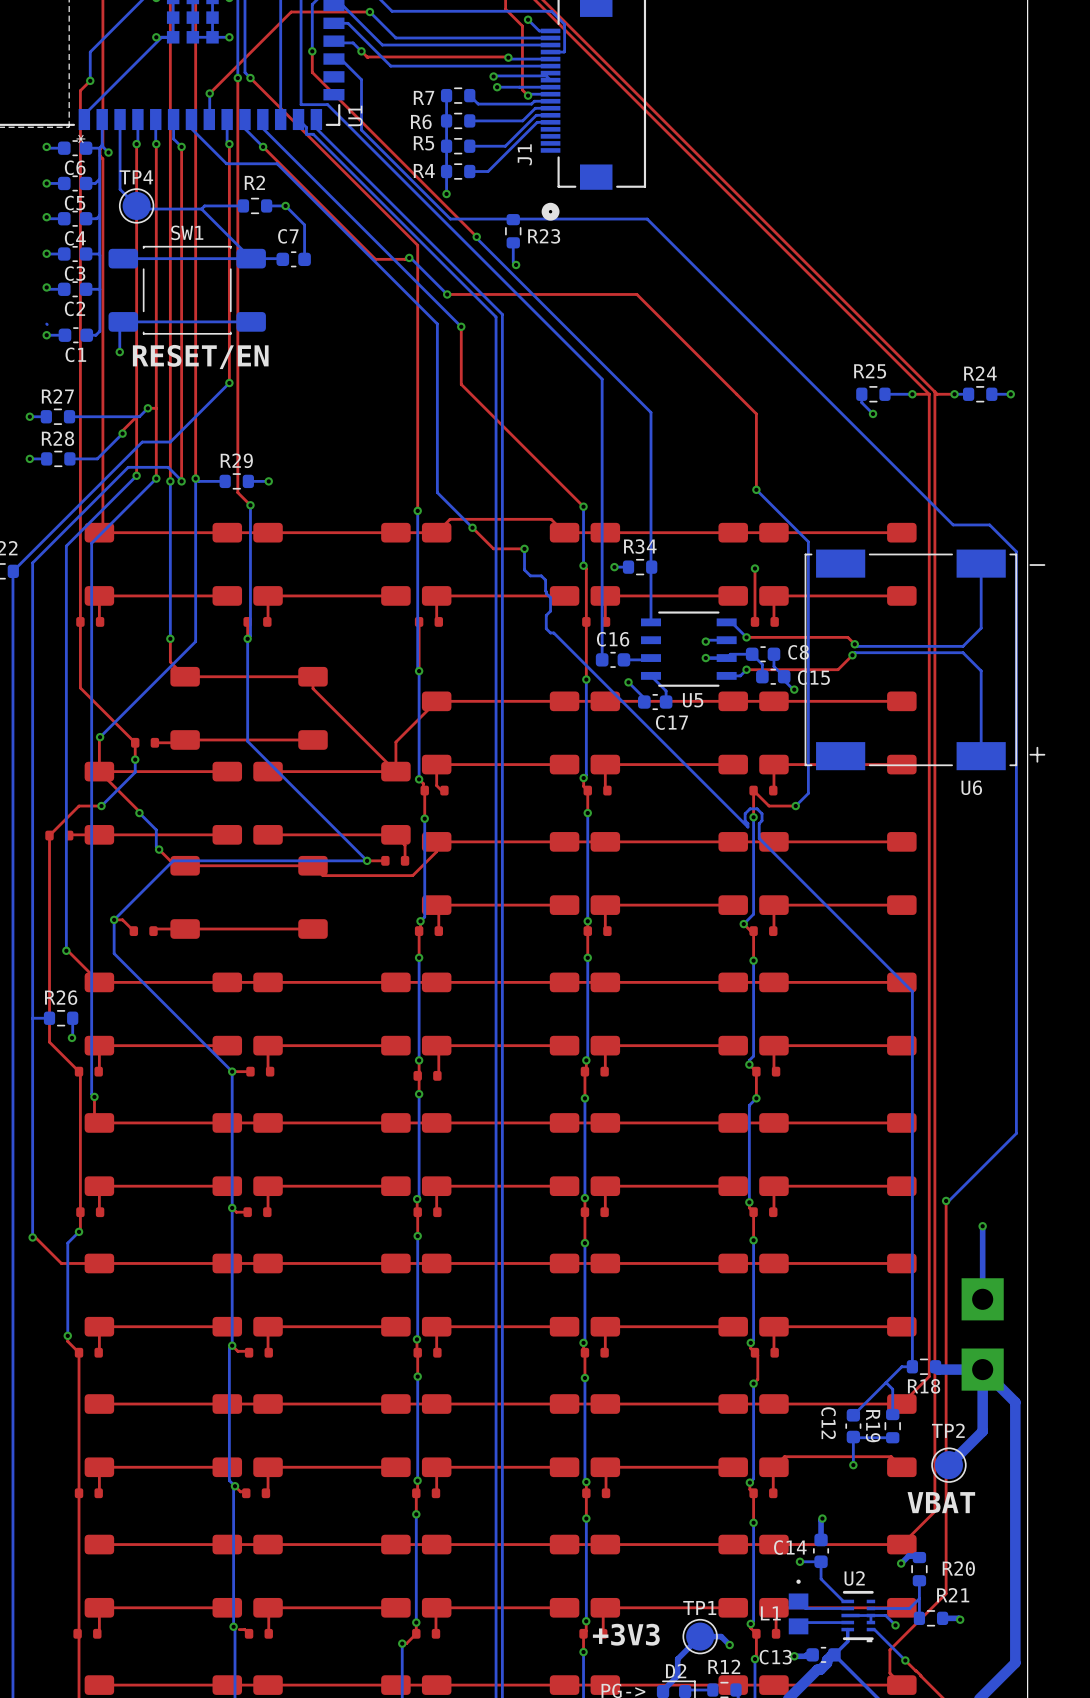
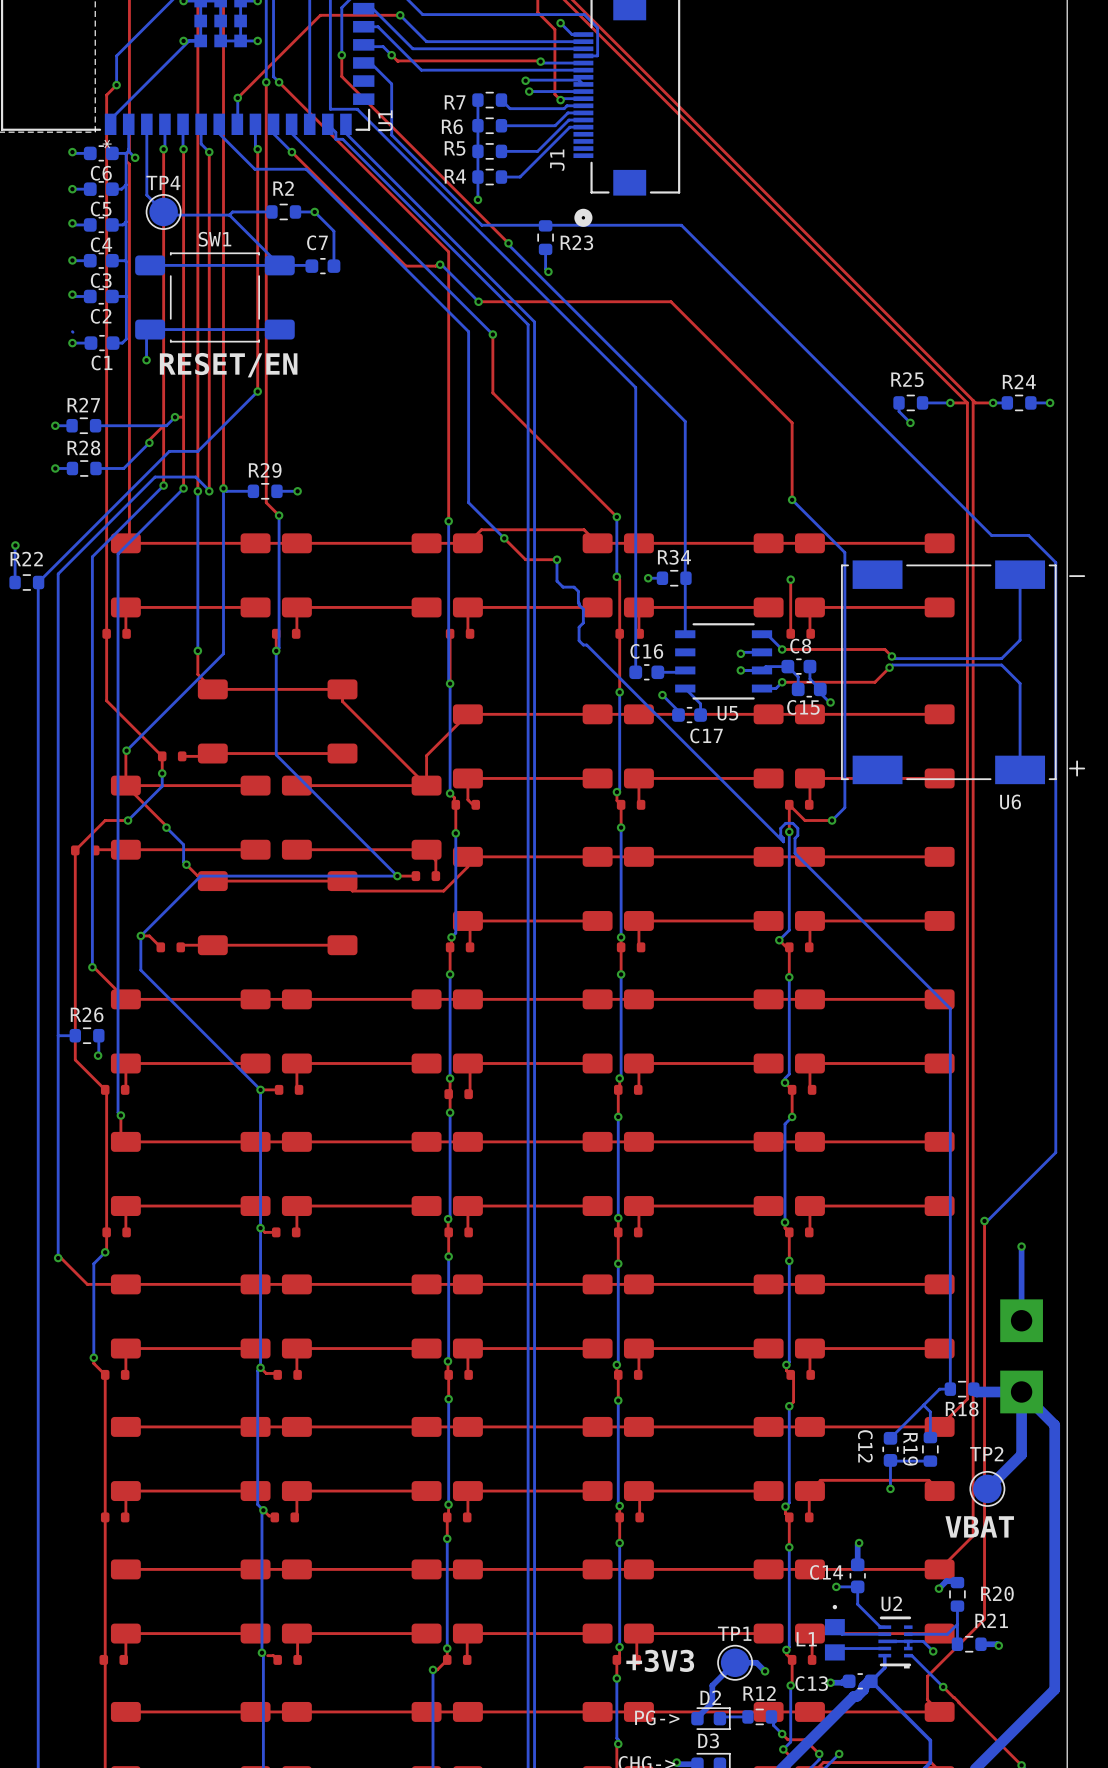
C8 name position: C8 (798, 652) -> C8 (800, 646)
C15 name position: C15 (813, 677) -> C15 (803, 707)

